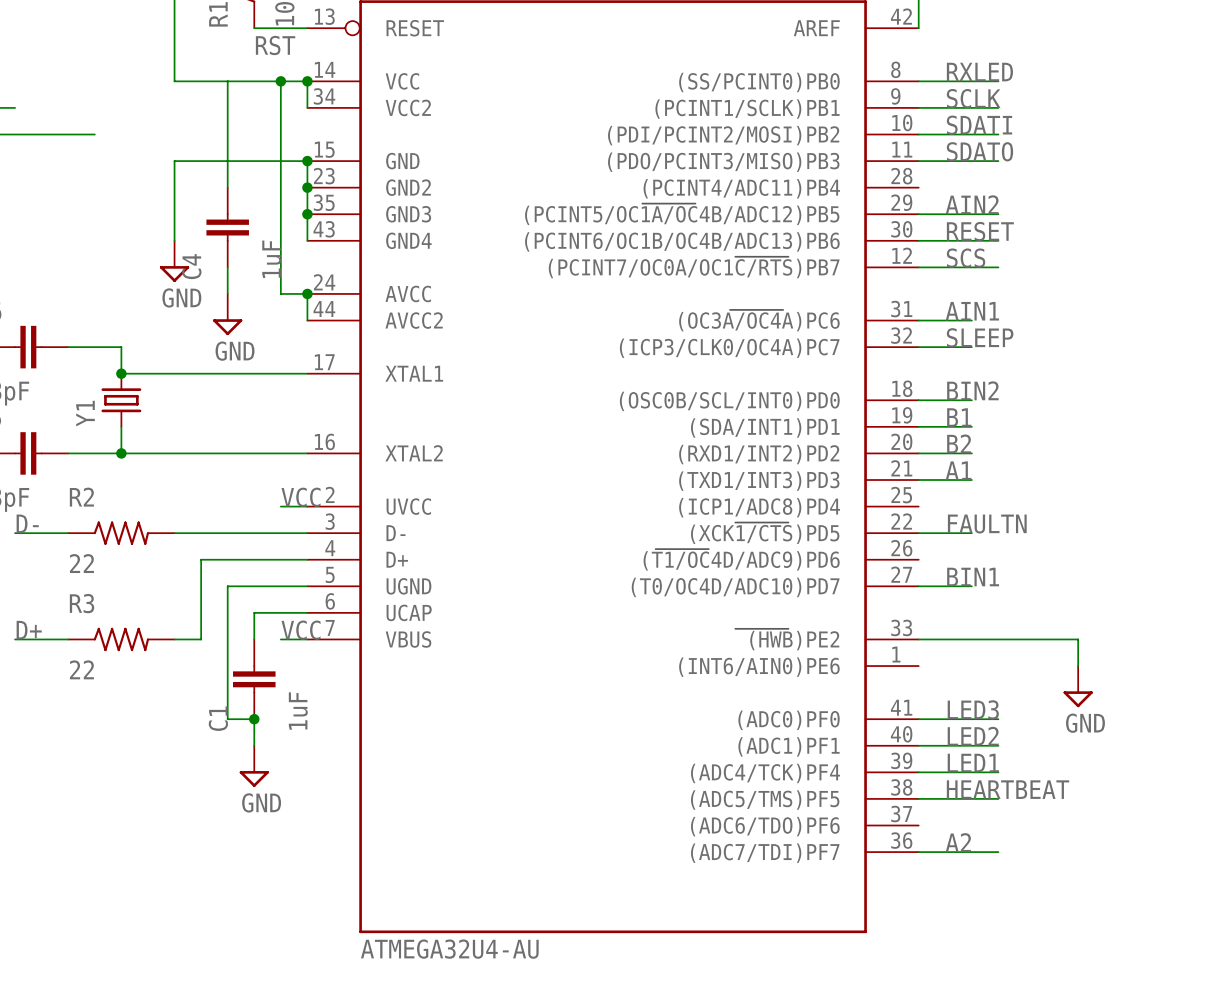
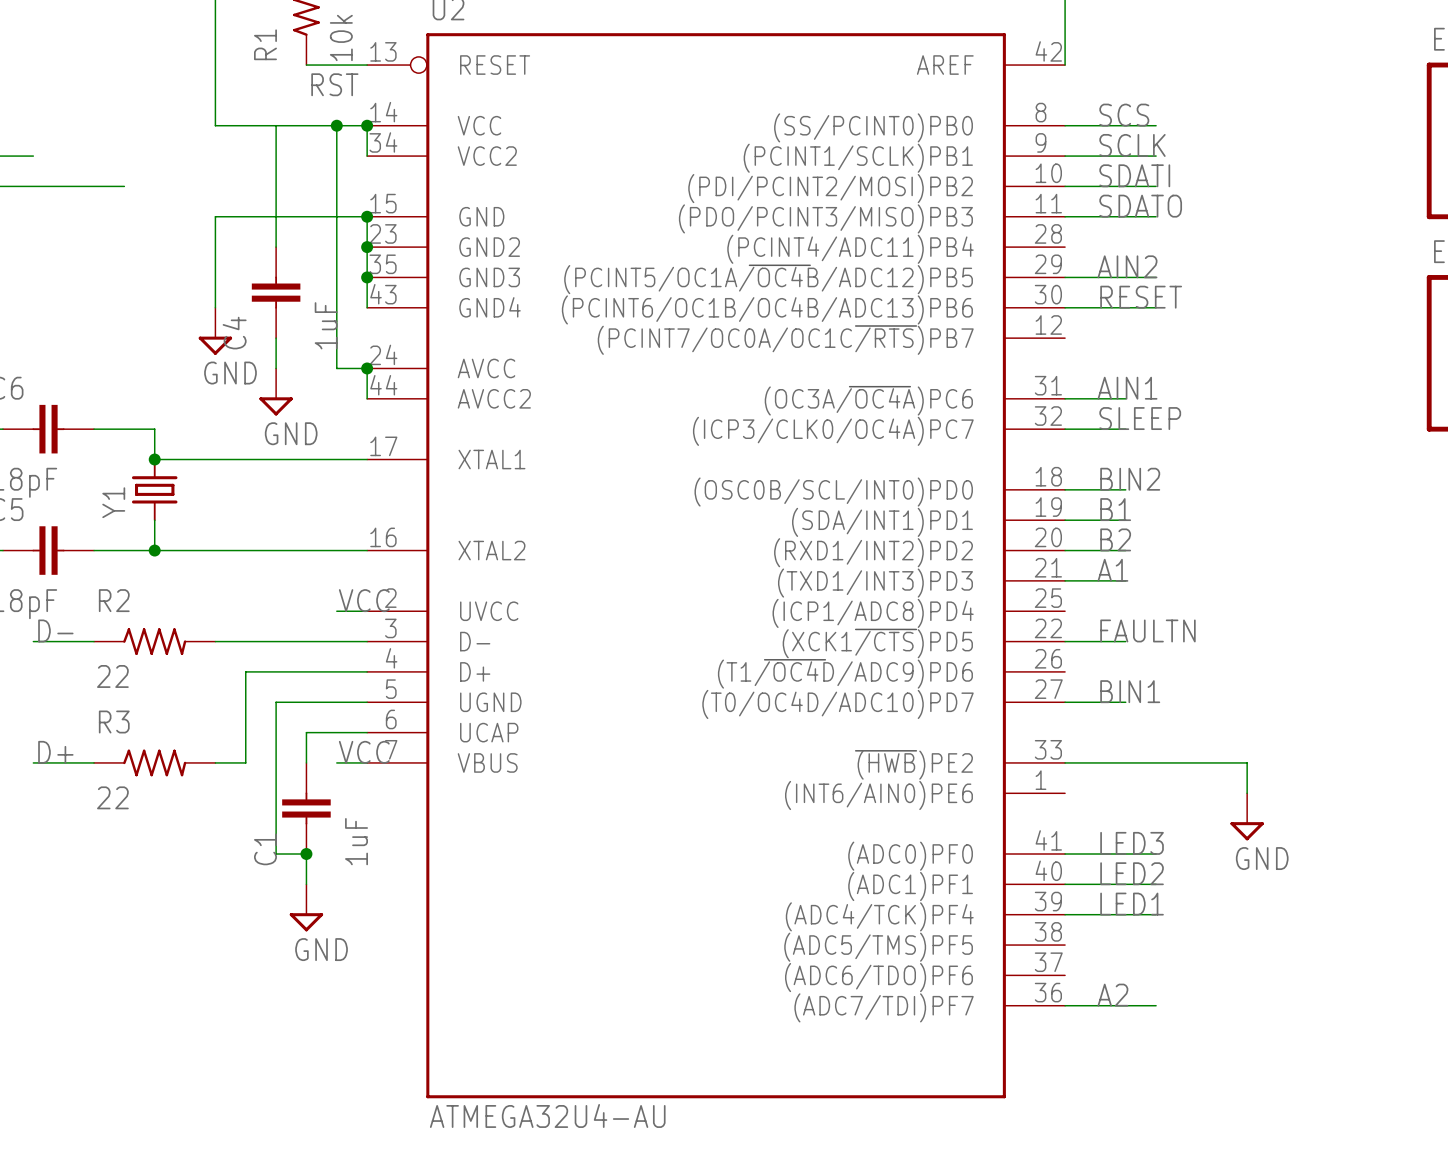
label: RXLED (979, 72) -> SCS (1124, 115)
label: SCS (966, 258) -> none
wire: (918, 267) (998, 267) -> none
label: HEARTBEAT (1008, 789) -> none
wire: (918, 798) (998, 798) -> none

